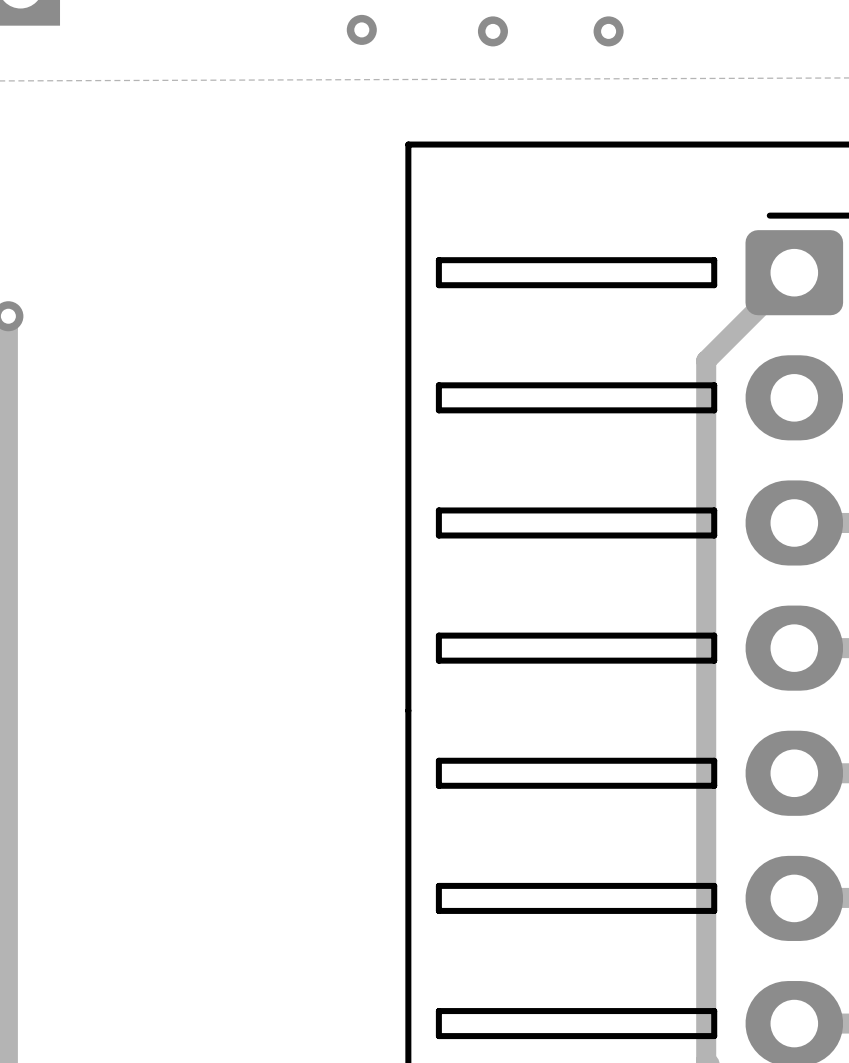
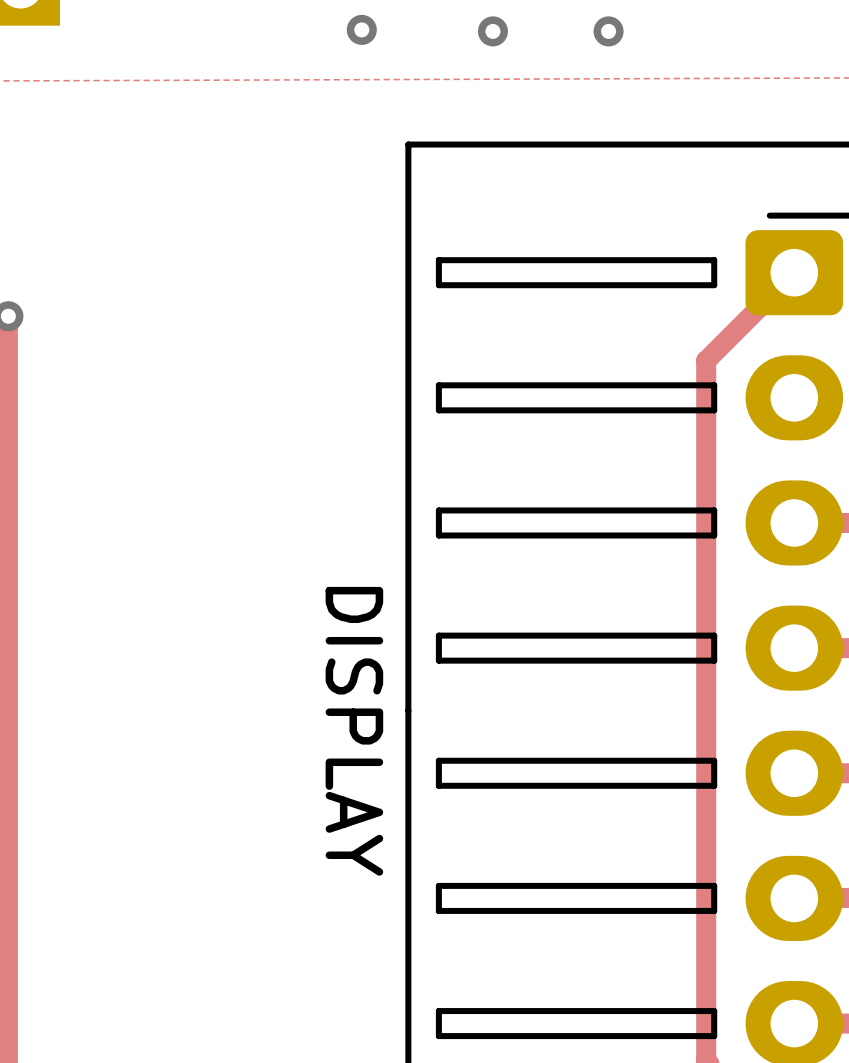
text: none -> DISPLAY (354, 731)

